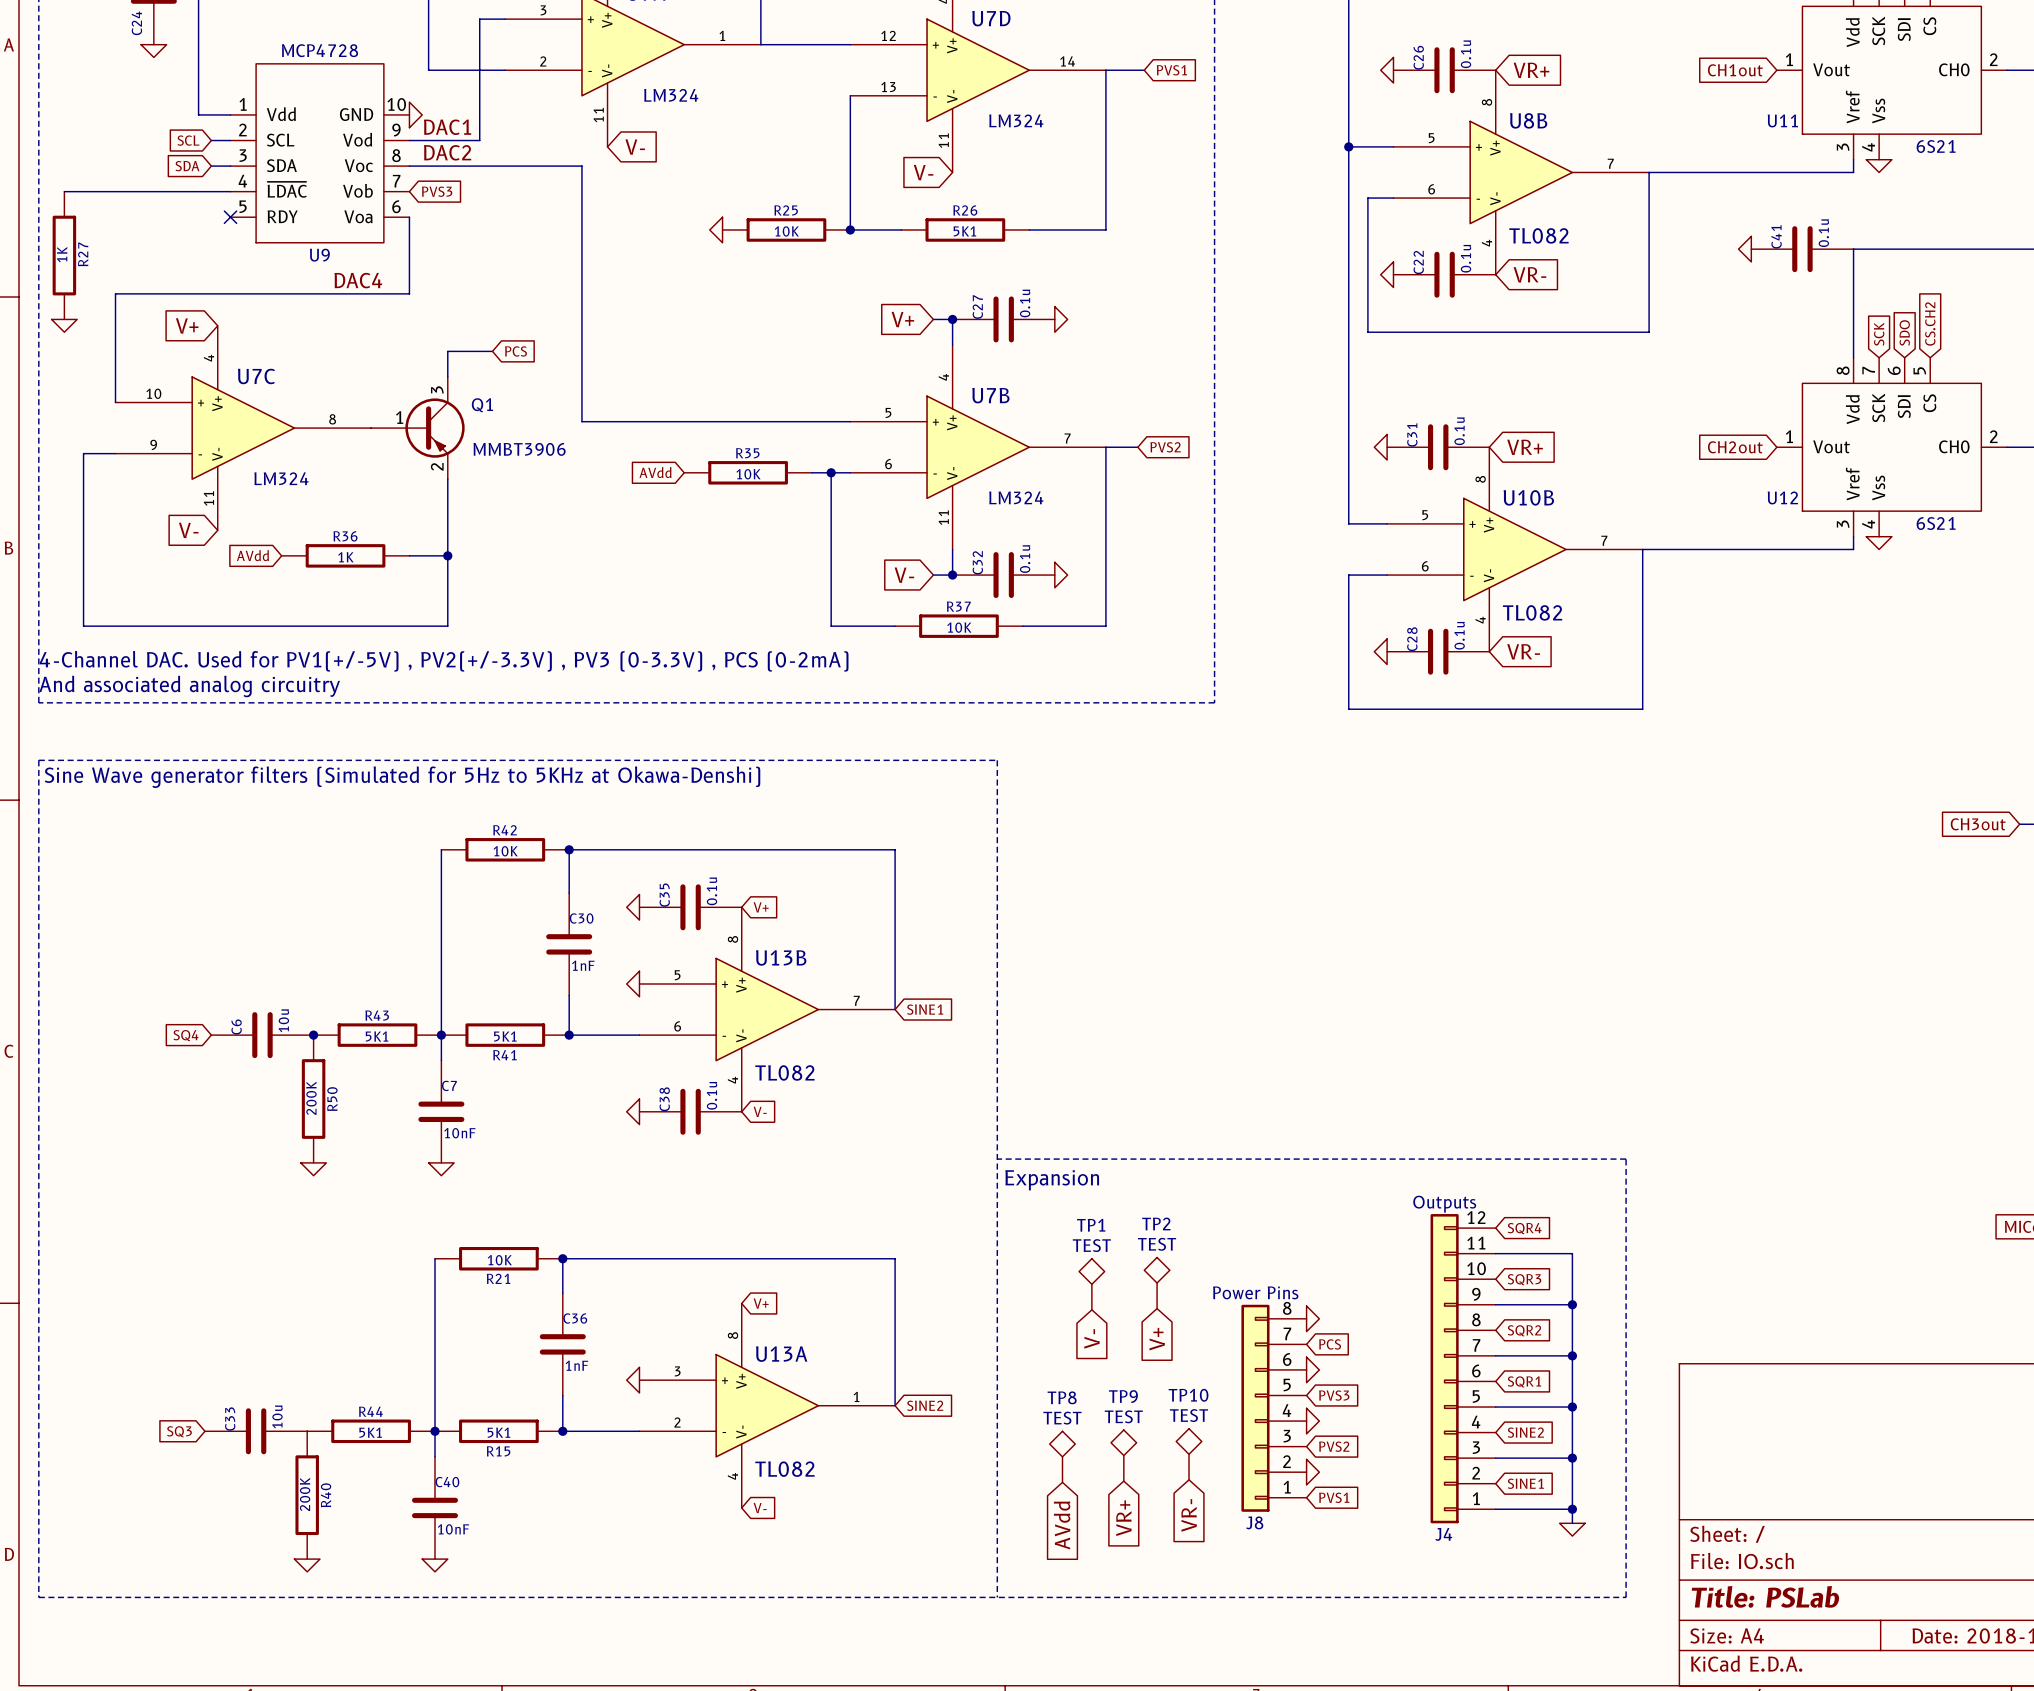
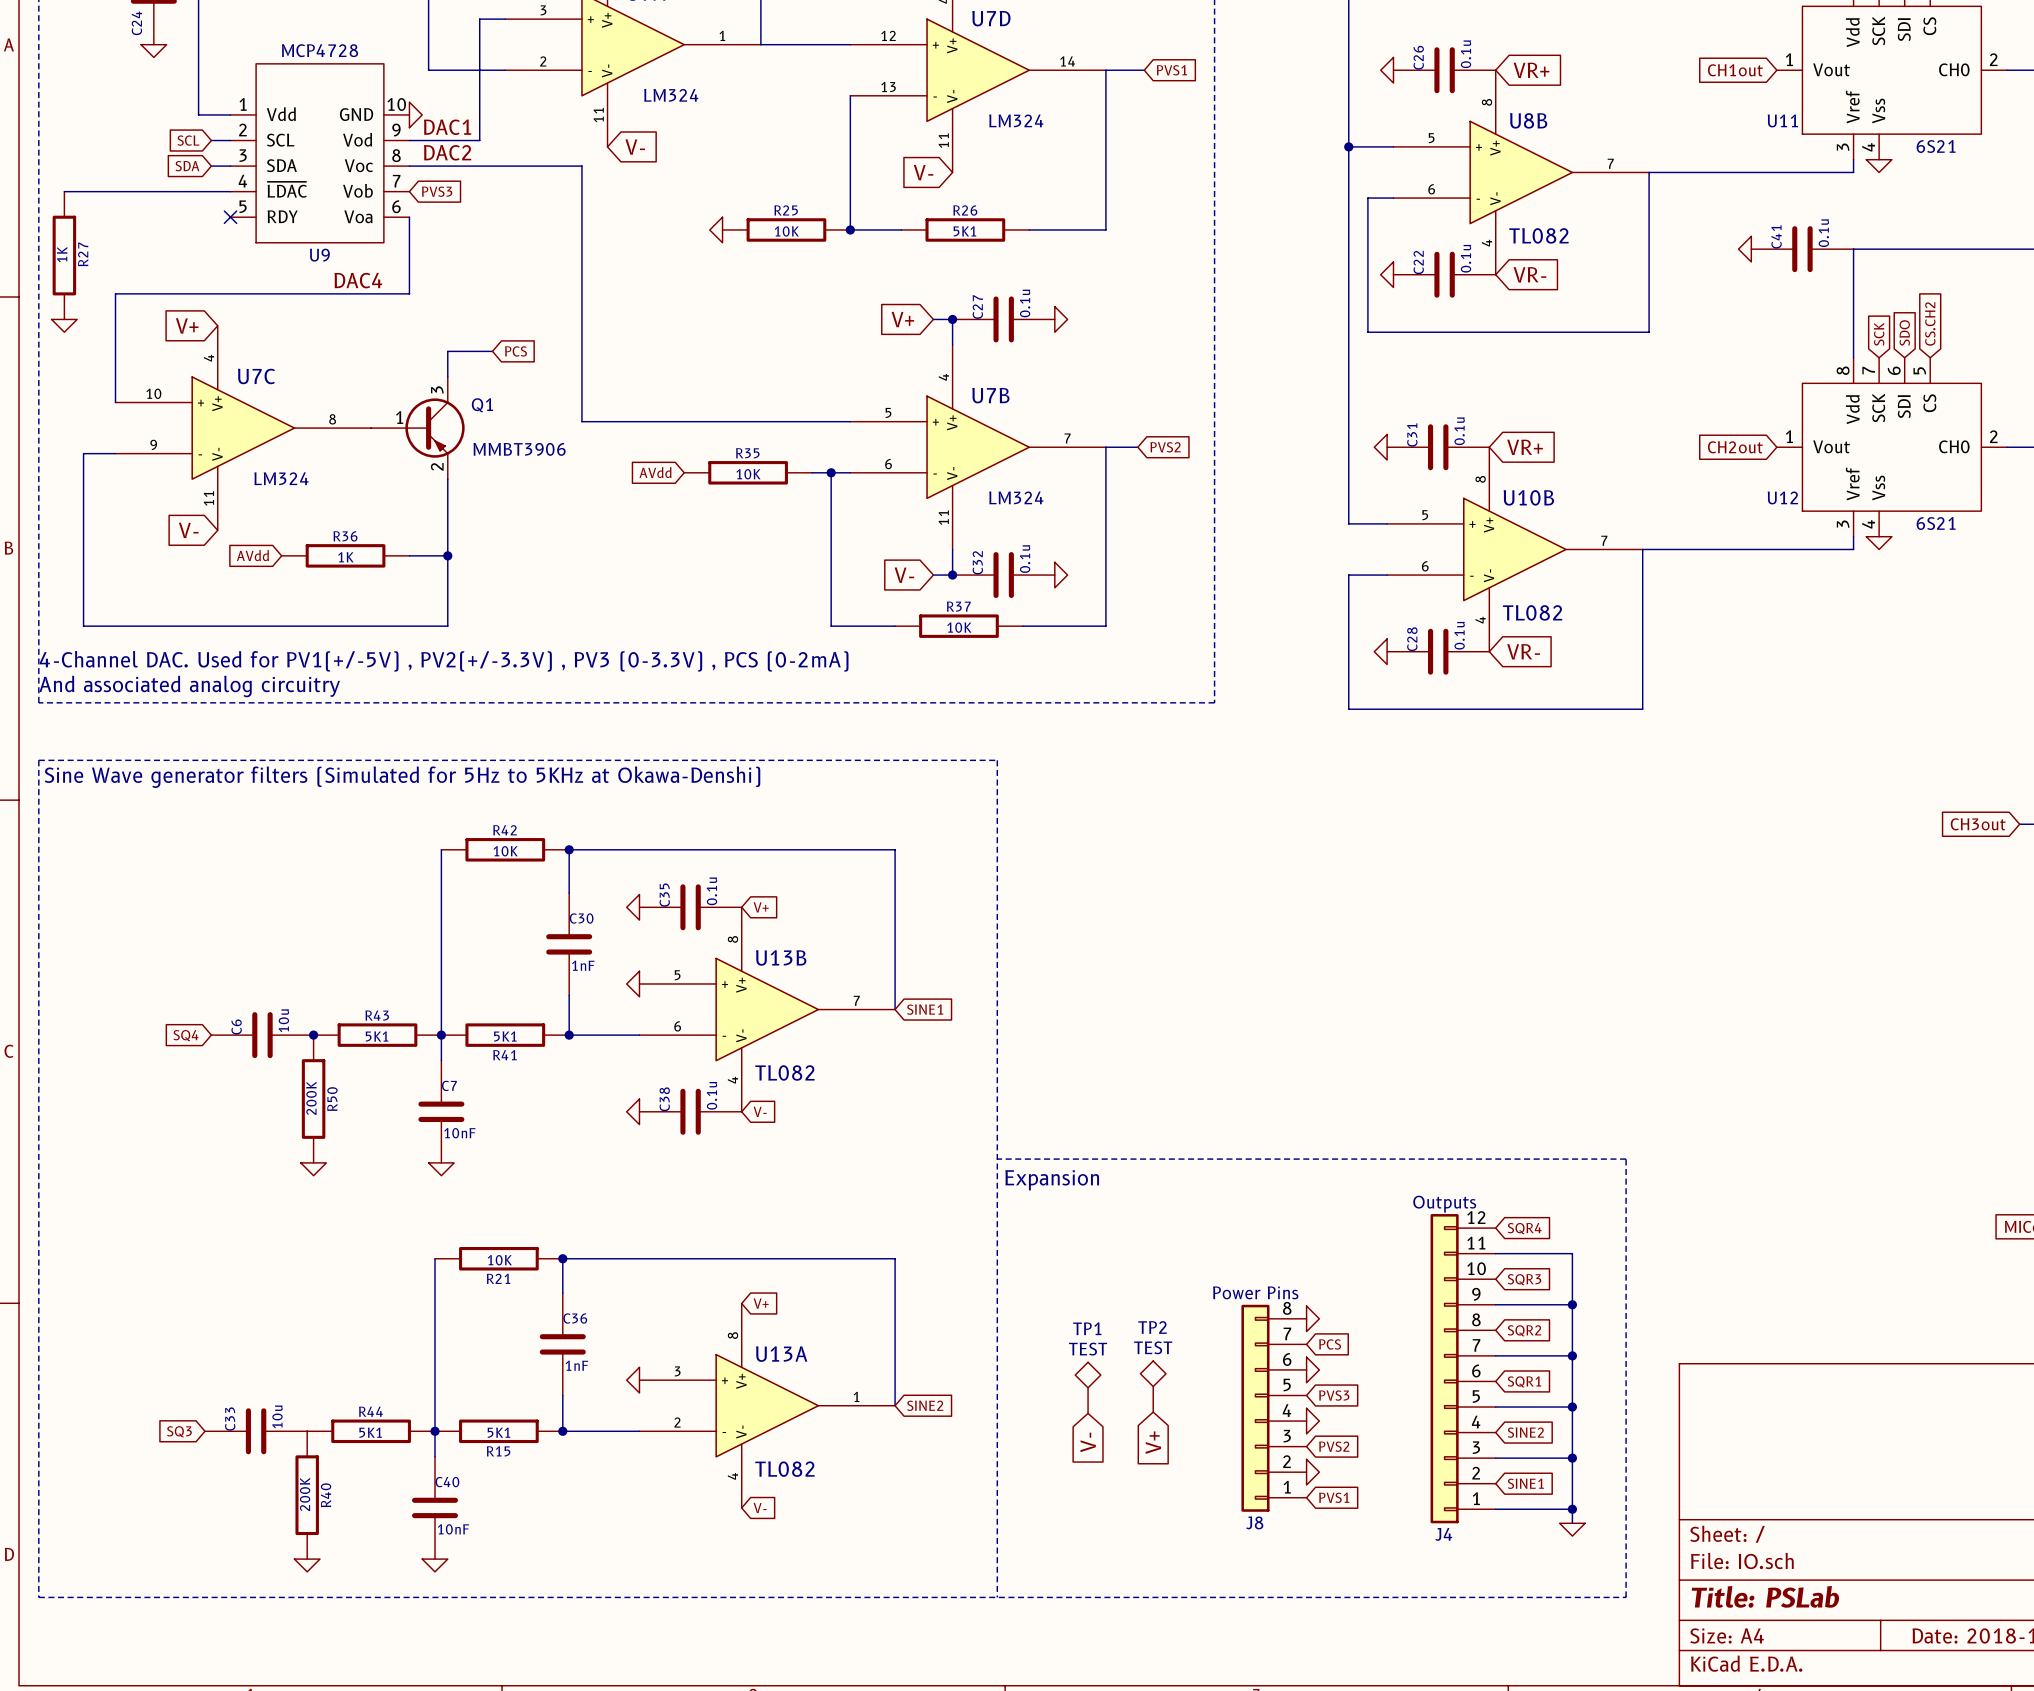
TP2 position: (1157, 1283) -> (1153, 1386)
TP1 position: (1091, 1284) -> (1088, 1387)
global label position: V- (1091, 1338) -> V- (1088, 1442)
global label position: V+ (1157, 1339) -> V+ (1153, 1442)
TP10: TEST (1189, 1454) -> none
TP9: TEST (1123, 1455) -> none
TP8: TEST (1062, 1456) -> none
global label: VR- (1189, 1515) -> none
global label: VR+ (1123, 1518) -> none
global label: AVdd (1062, 1525) -> none

